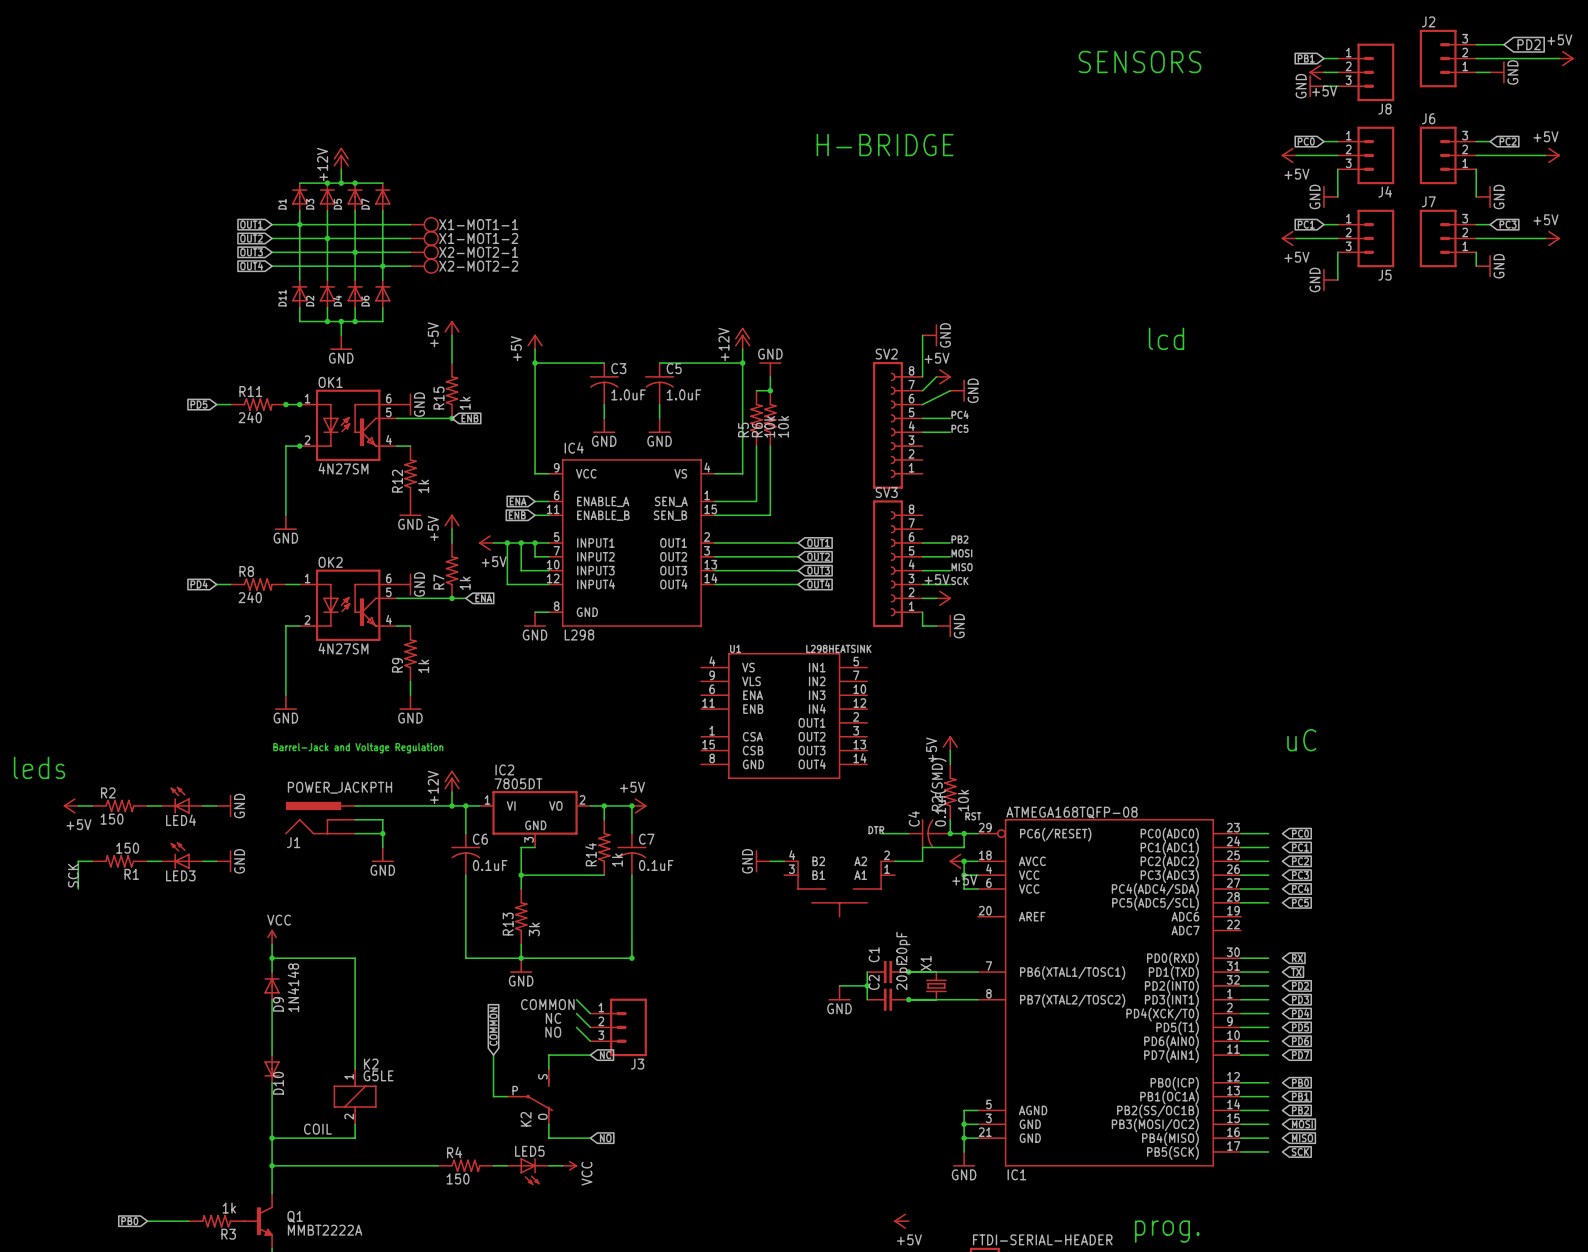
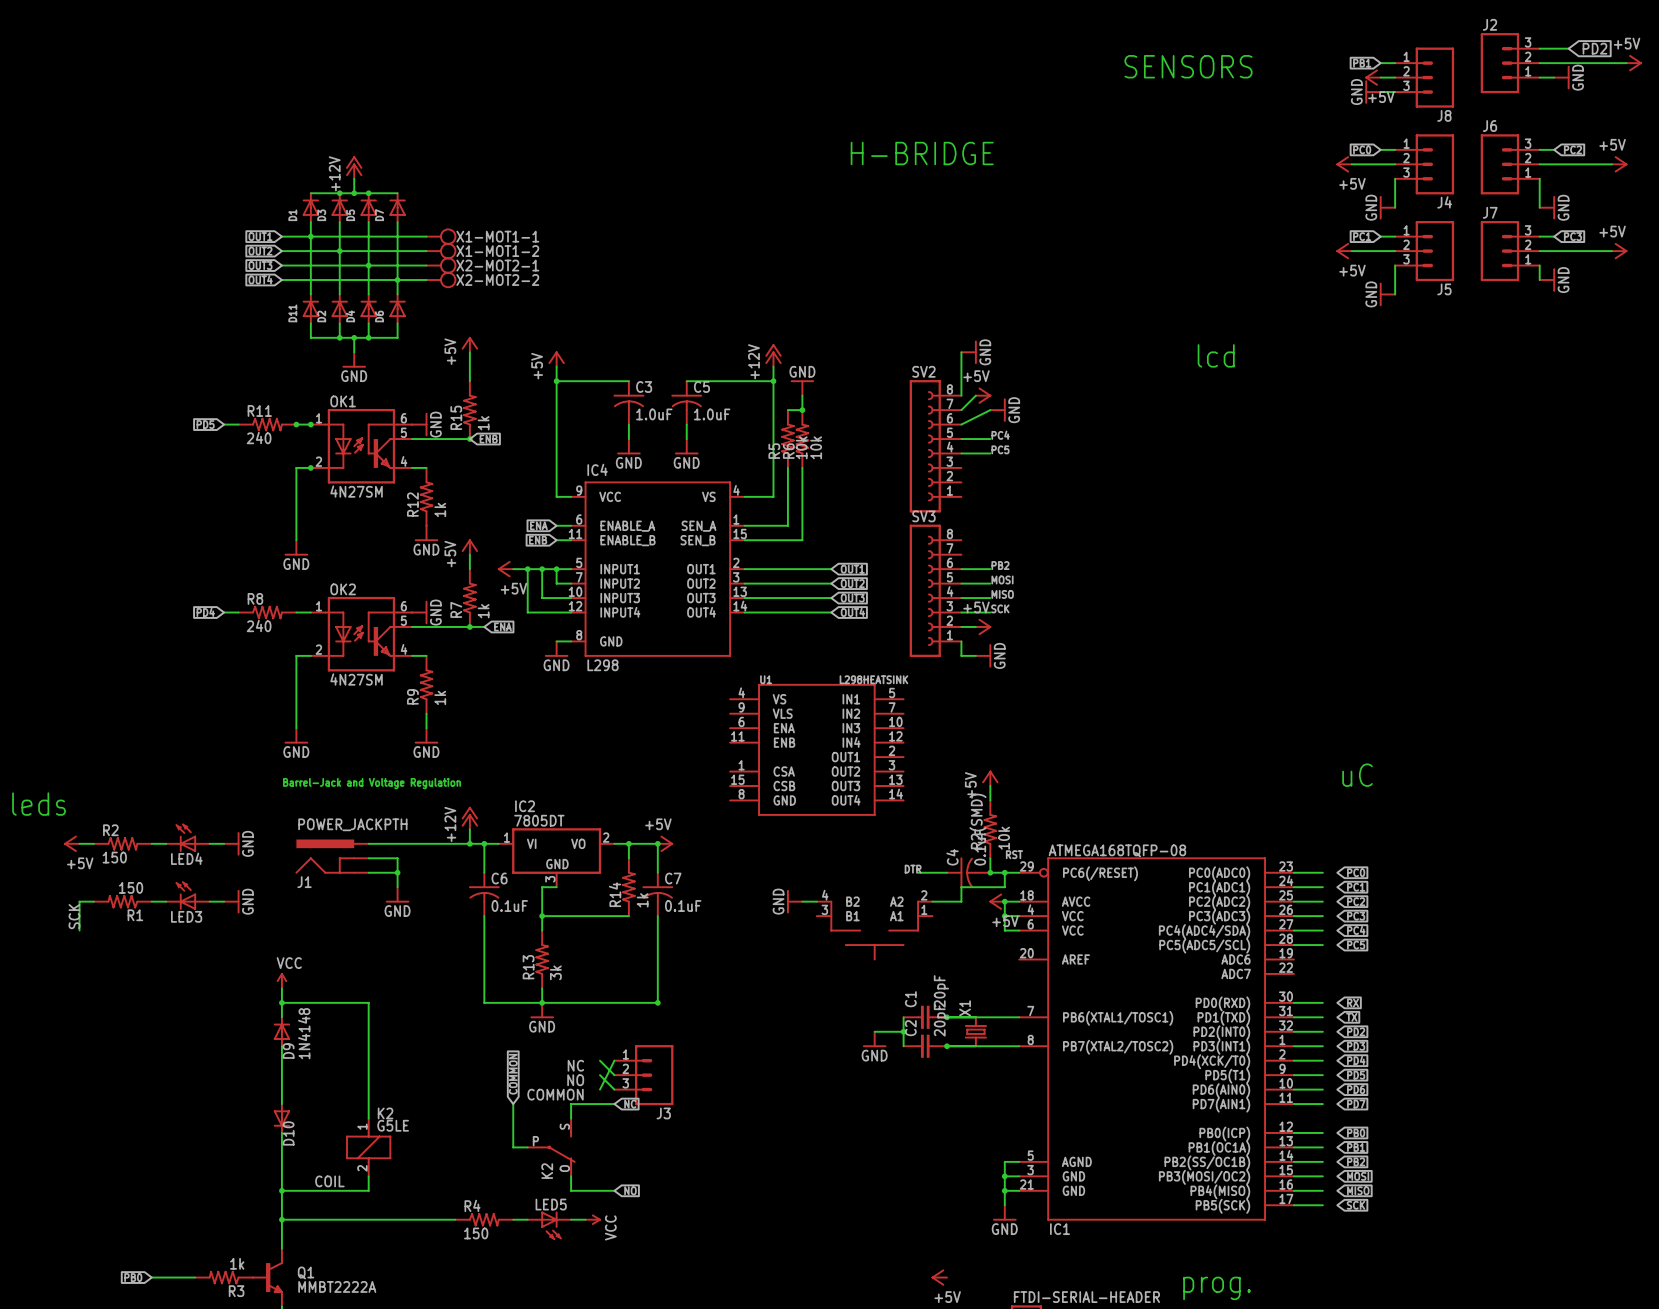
wire: (576, 999) (590, 1013) -> (599, 1089) (614, 1060)
label position: COMMON (547, 1004) -> COMMON (555, 1094)

